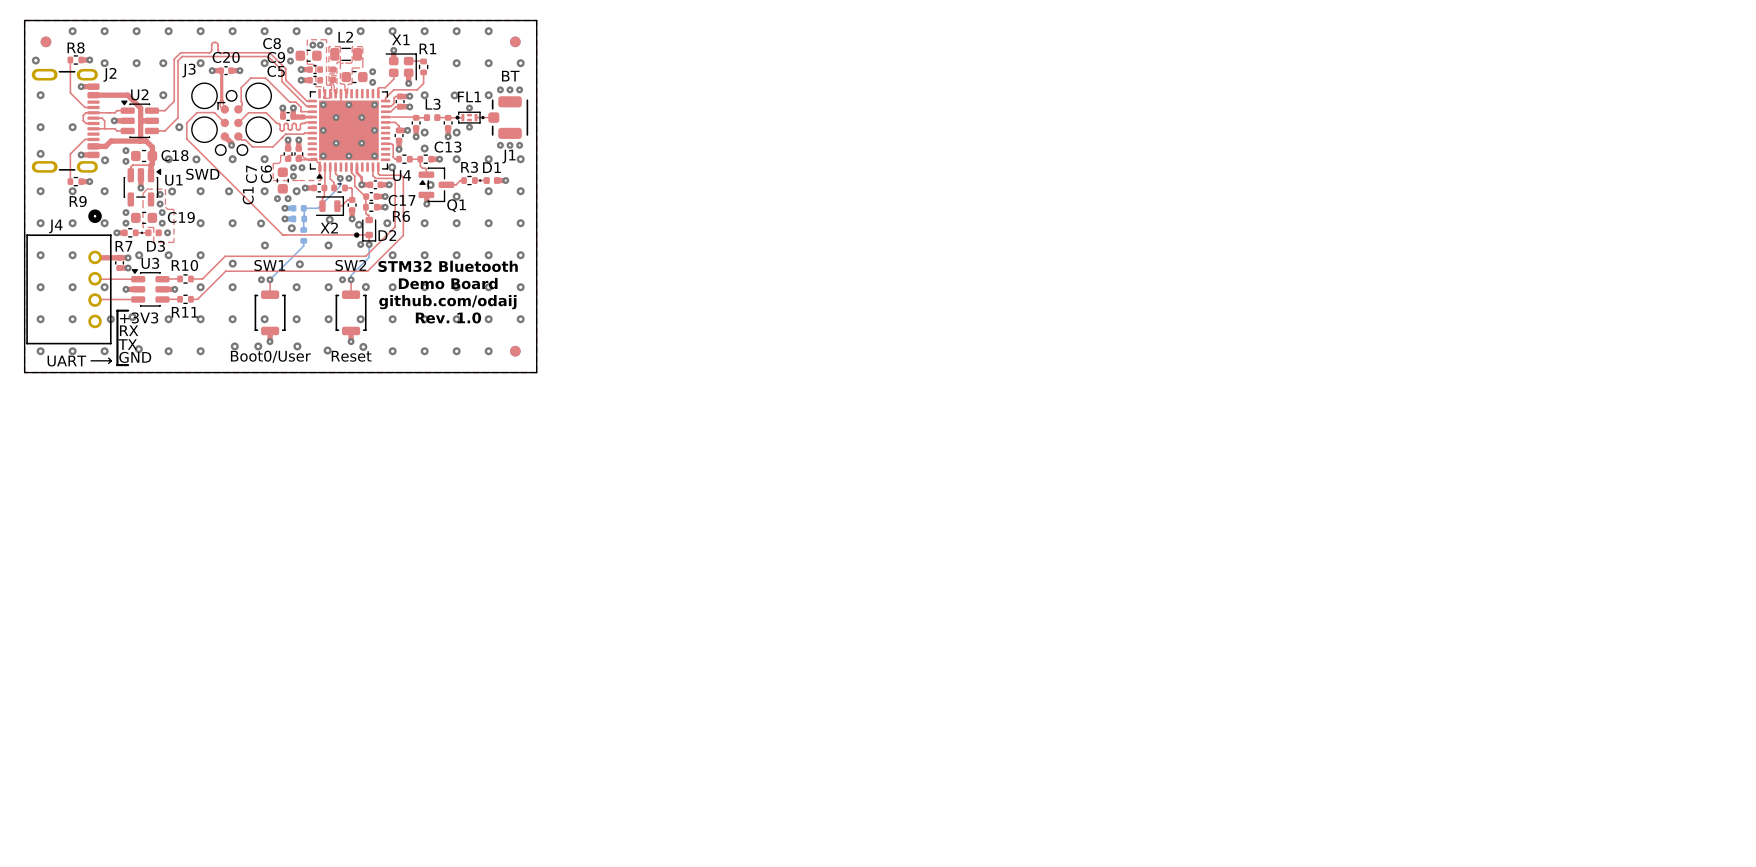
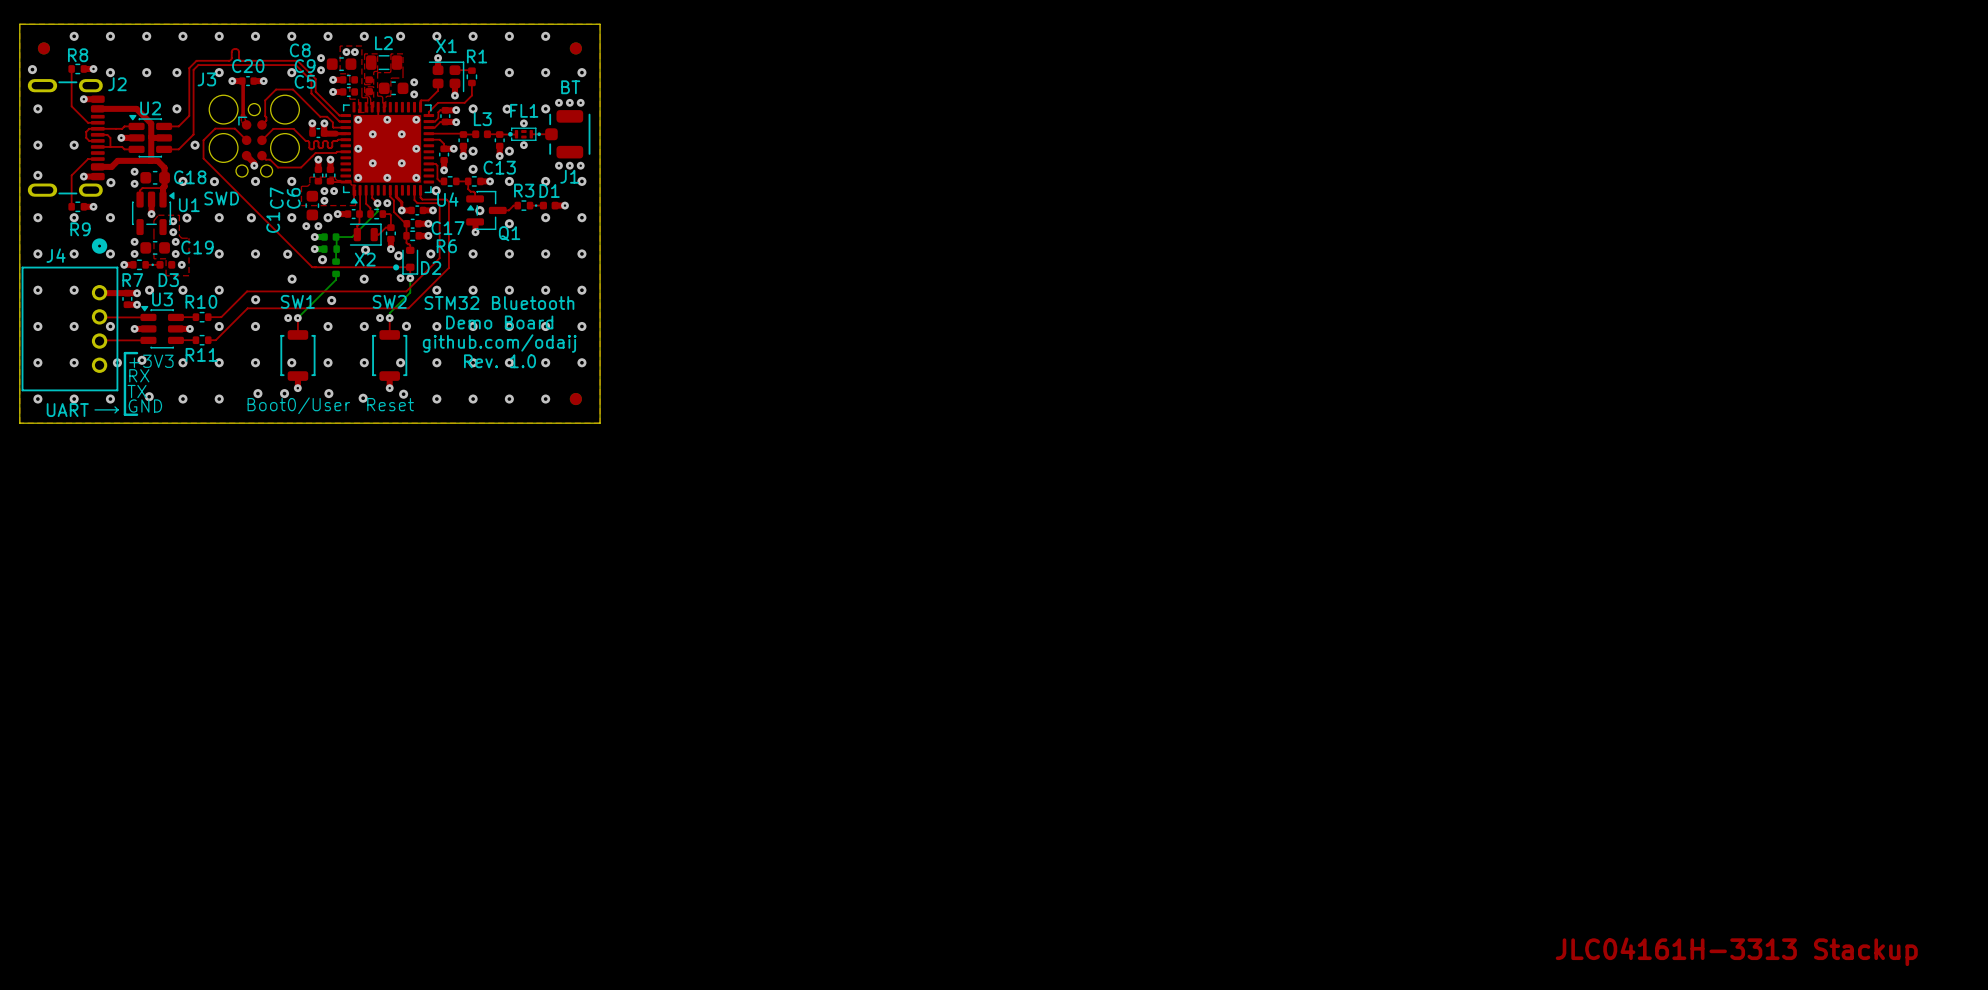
text: none -> JLC04161H-3313 Stackup (1736, 951)

